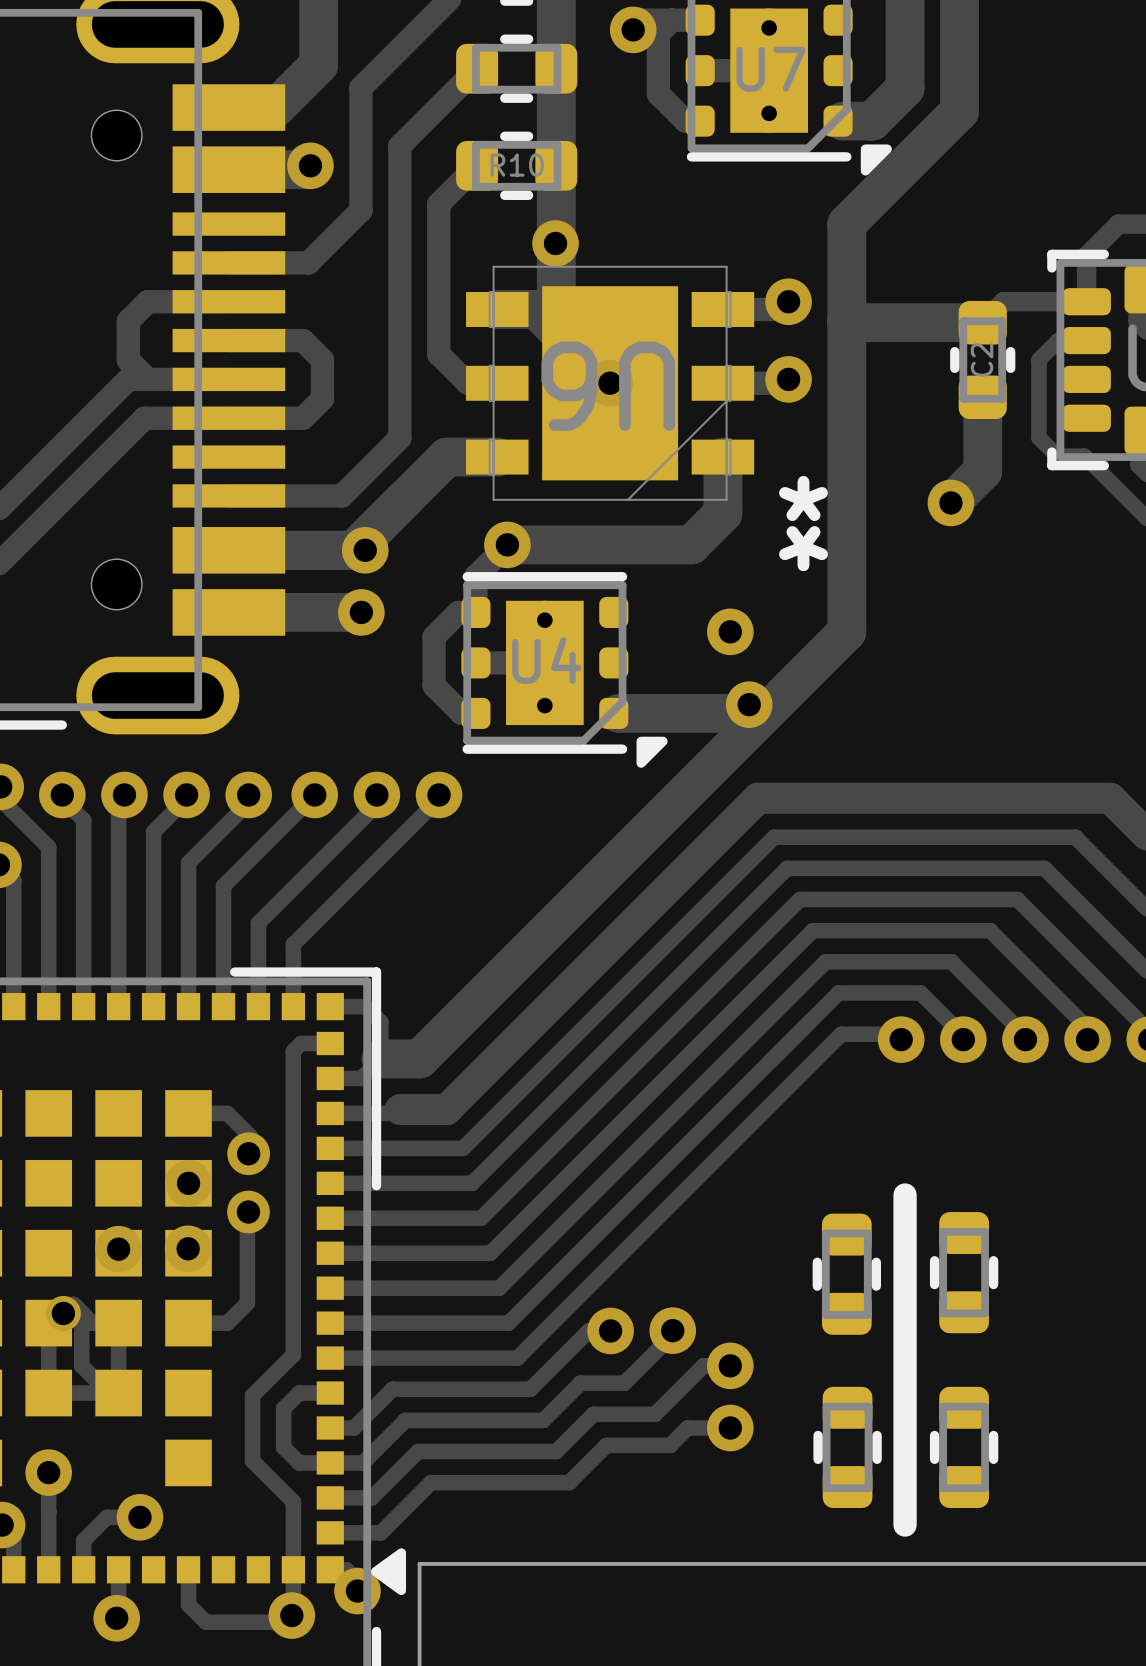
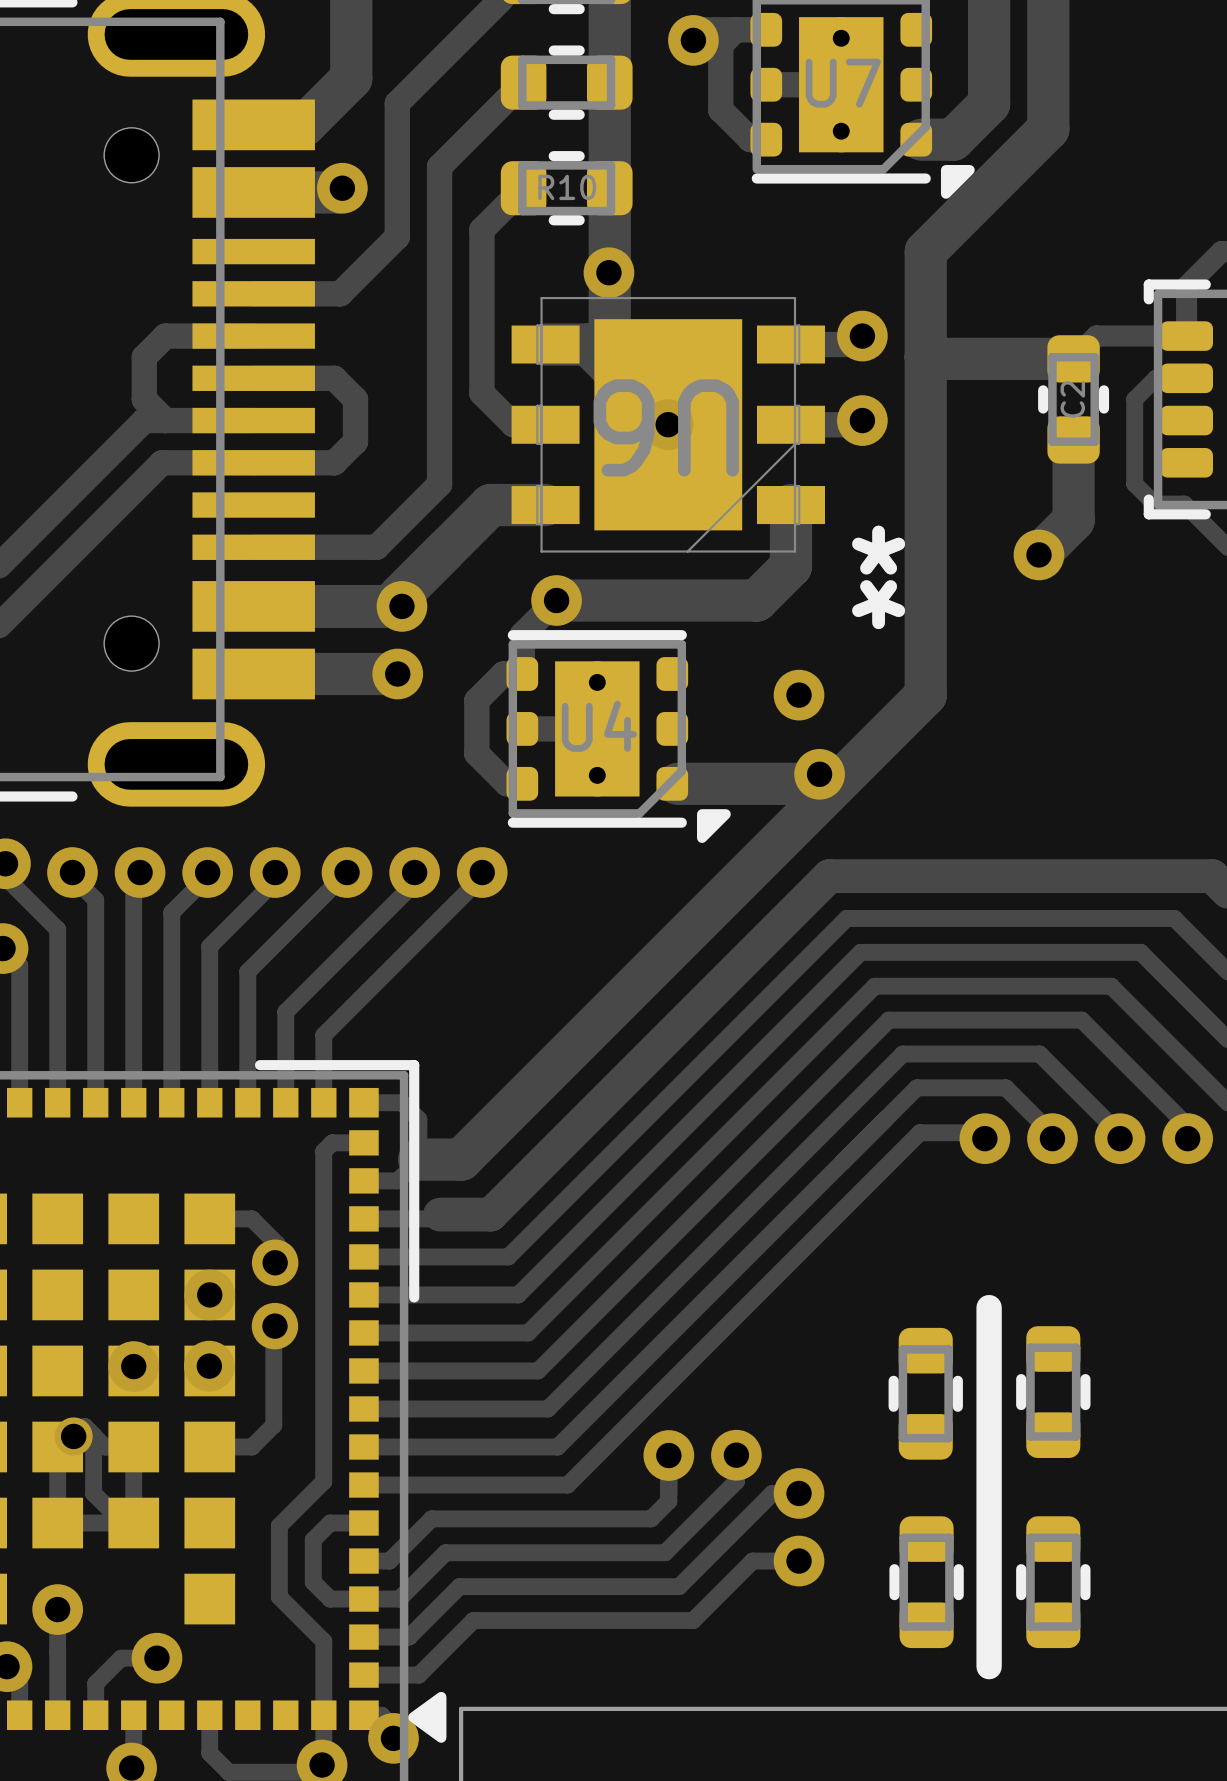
track: (610, 1330) (588, 1330) (530, 1389) -> (668, 1455) (668, 1501) (651, 1518) (581, 1518)
track: (672, 1334) (624, 1383) (580, 1383) (543, 1420) -> (736, 1459) (736, 1481) (665, 1552) (595, 1552)
track: (705, 1365) (703, 1365) (655, 1414) (593, 1414) (556, 1451) -> (772, 1493) (679, 1586) (609, 1586)
track: (670, 1445) (606, 1445) (569, 1482) -> (733, 1580) (693, 1620) (623, 1620)

